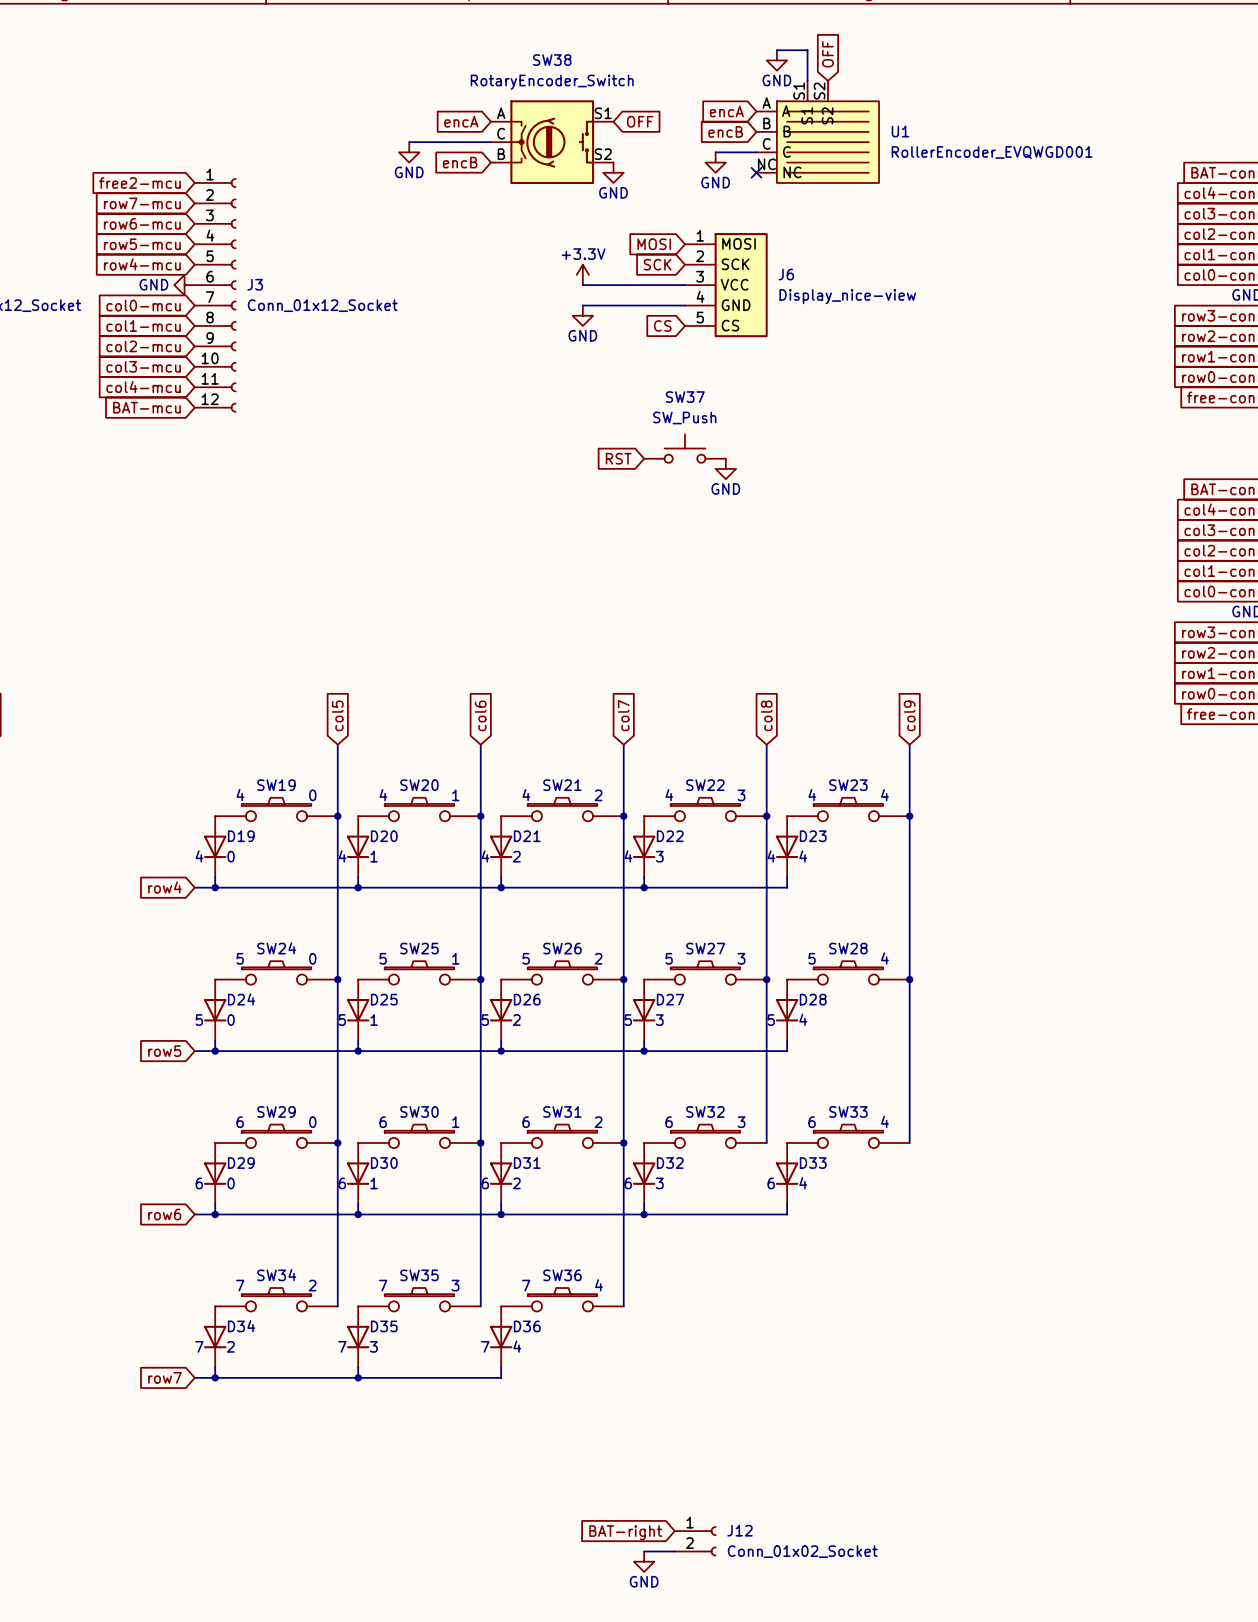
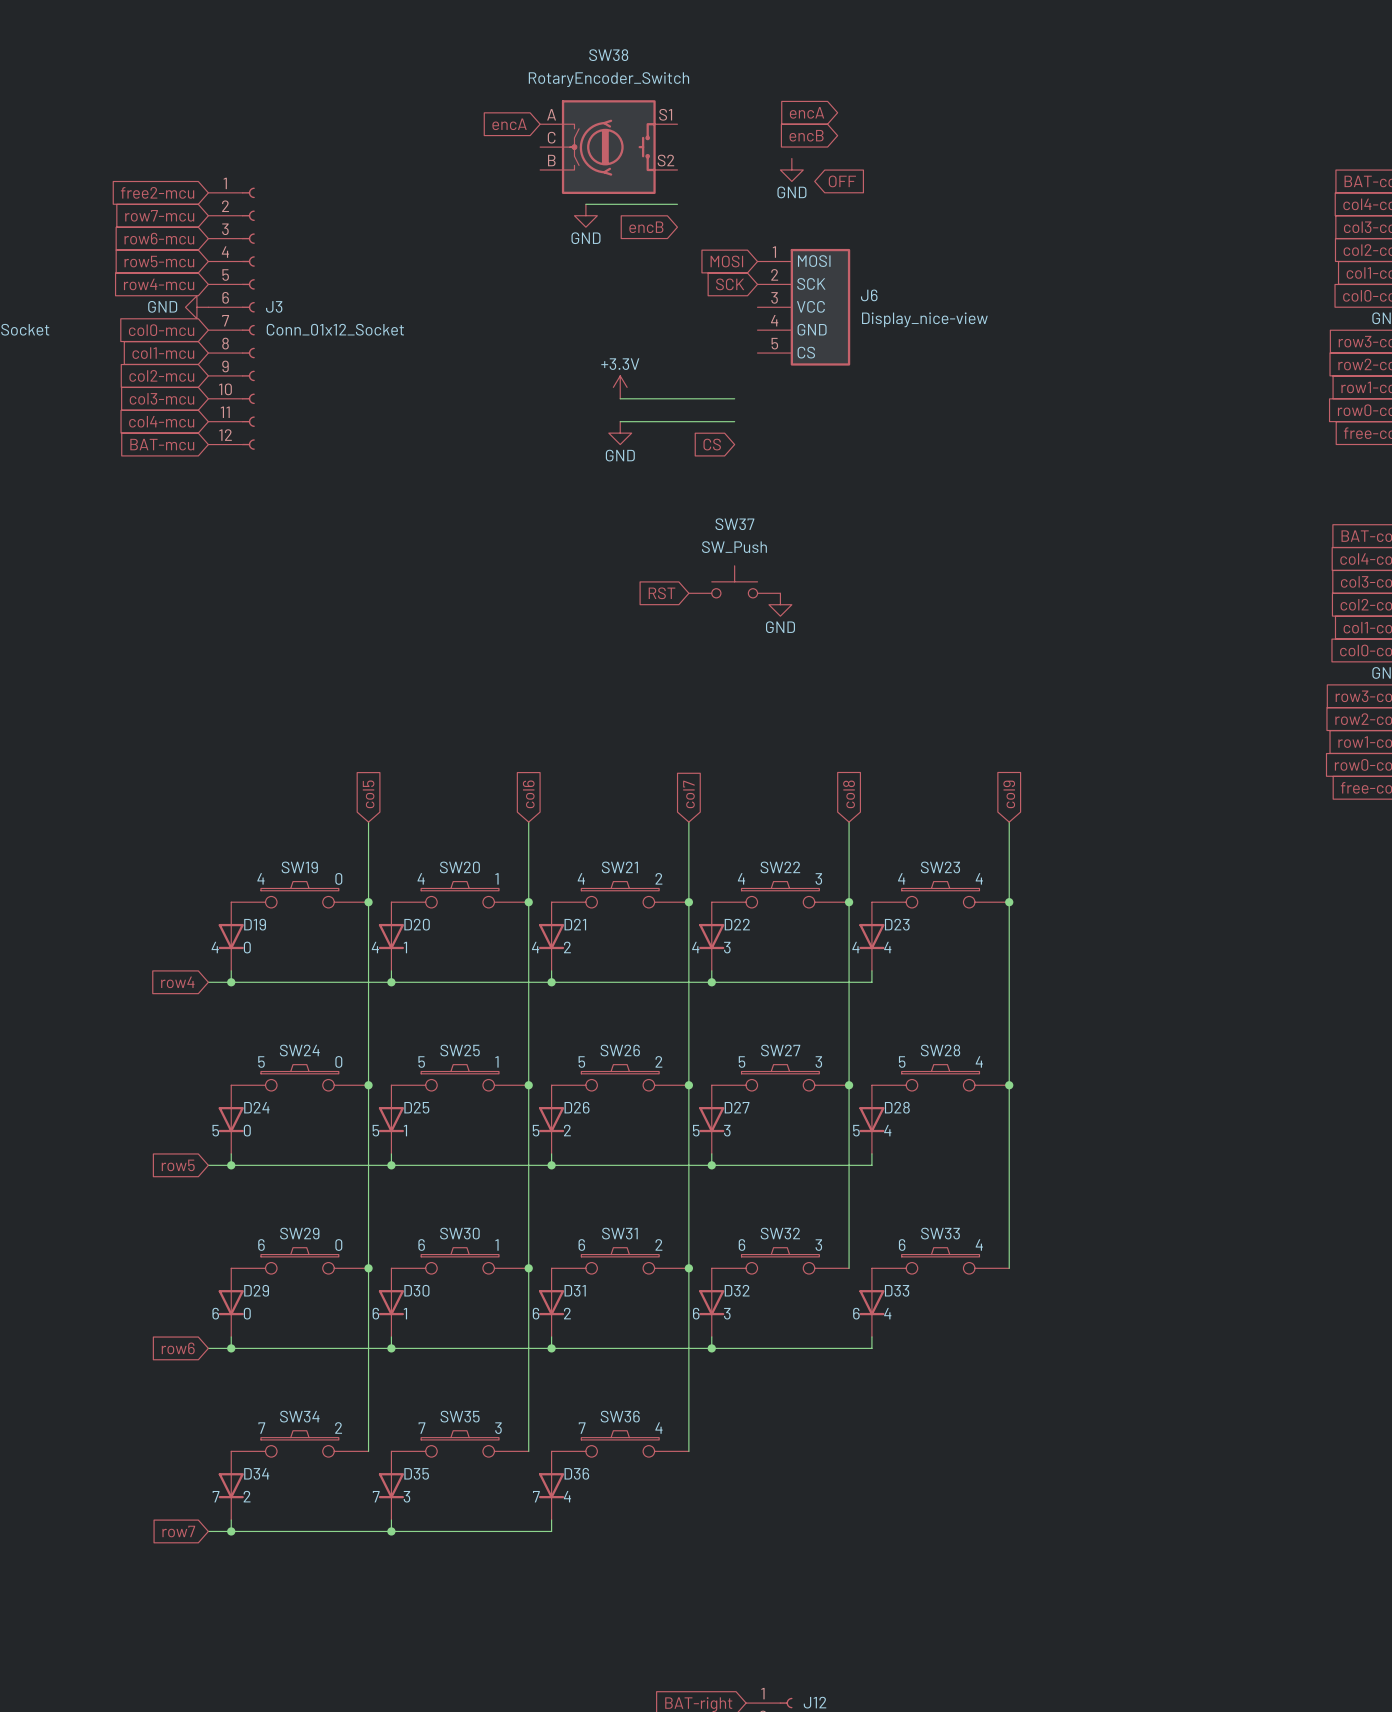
wire: (776, 50) (807, 50) (807, 80) -> none
global label: OFF (827, 54) -> none
power symbol: GND (776, 60) -> none
global label: OFF (640, 121) -> none
U1: RollerEncoder_EVQWGD001 (817, 131) -> none
wire: (409, 142) (490, 142) -> (585, 204) (677, 204)
power symbol: GND (409, 152) -> none
wire: (715, 152) (756, 152) -> none
global label position: encB (460, 162) -> encB (646, 227)
power symbol: GND (613, 172) -> none
no-connect mark: (756, 172) -> none
global label: none -> OFF (842, 181)
power symbol: none -> GND (585, 215)
power symbol position: +3.3V (582, 274) -> +3.3V (620, 387)
wire: (582, 285) (684, 285) -> (620, 398) (734, 398)
wire: (582, 305) (684, 305) -> (620, 421) (734, 421)
power symbol: GND (582, 315) -> none
global label position: CS (662, 325) -> CS (712, 444)
power symbol: none -> GND (620, 433)
SW37 position: (684, 448) -> (734, 581)
global label position: RST (618, 458) -> RST (662, 593)
power symbol position: GND (725, 468) -> GND (780, 604)

